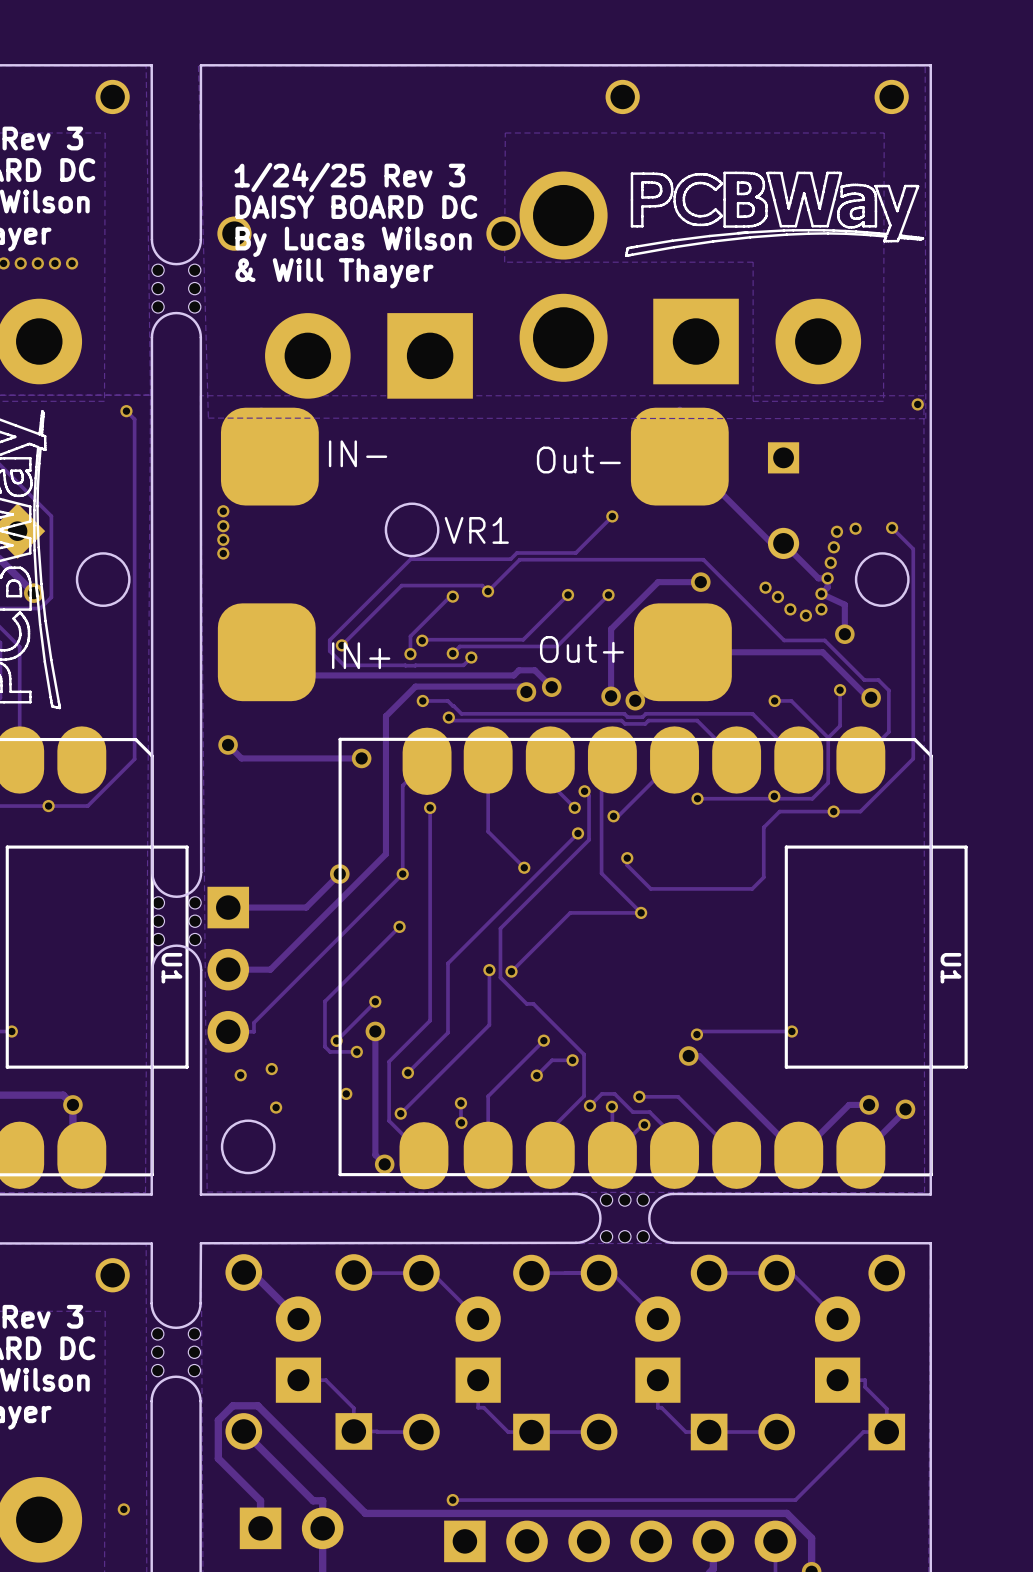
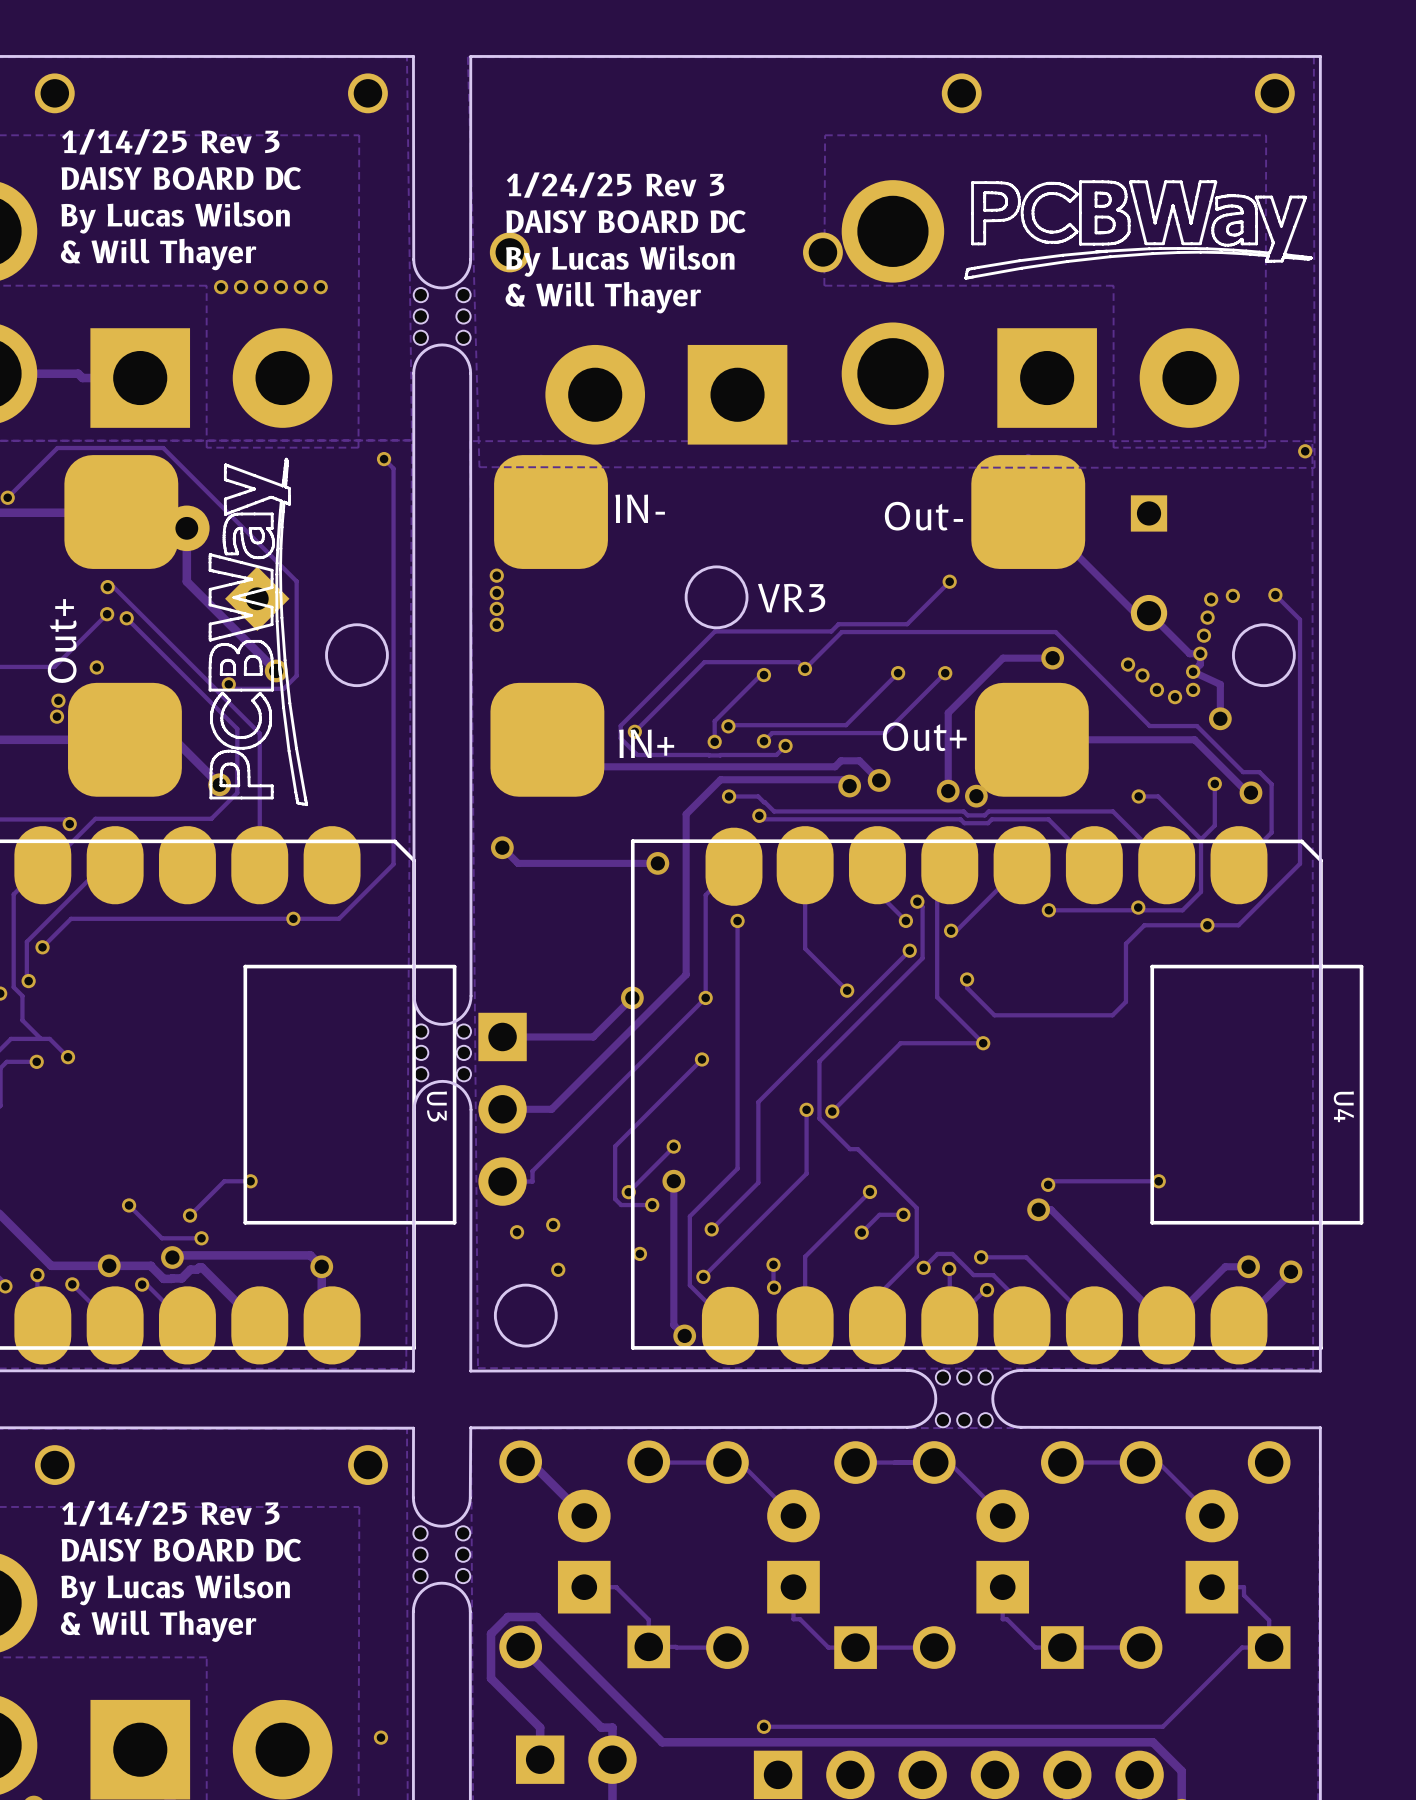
VR1 name: VR1 (476, 530) -> VR3 (791, 598)
U1 name: U1 (171, 968) -> U3 (436, 1106)
U1 name: U1 (951, 968) -> U4 (1343, 1106)

